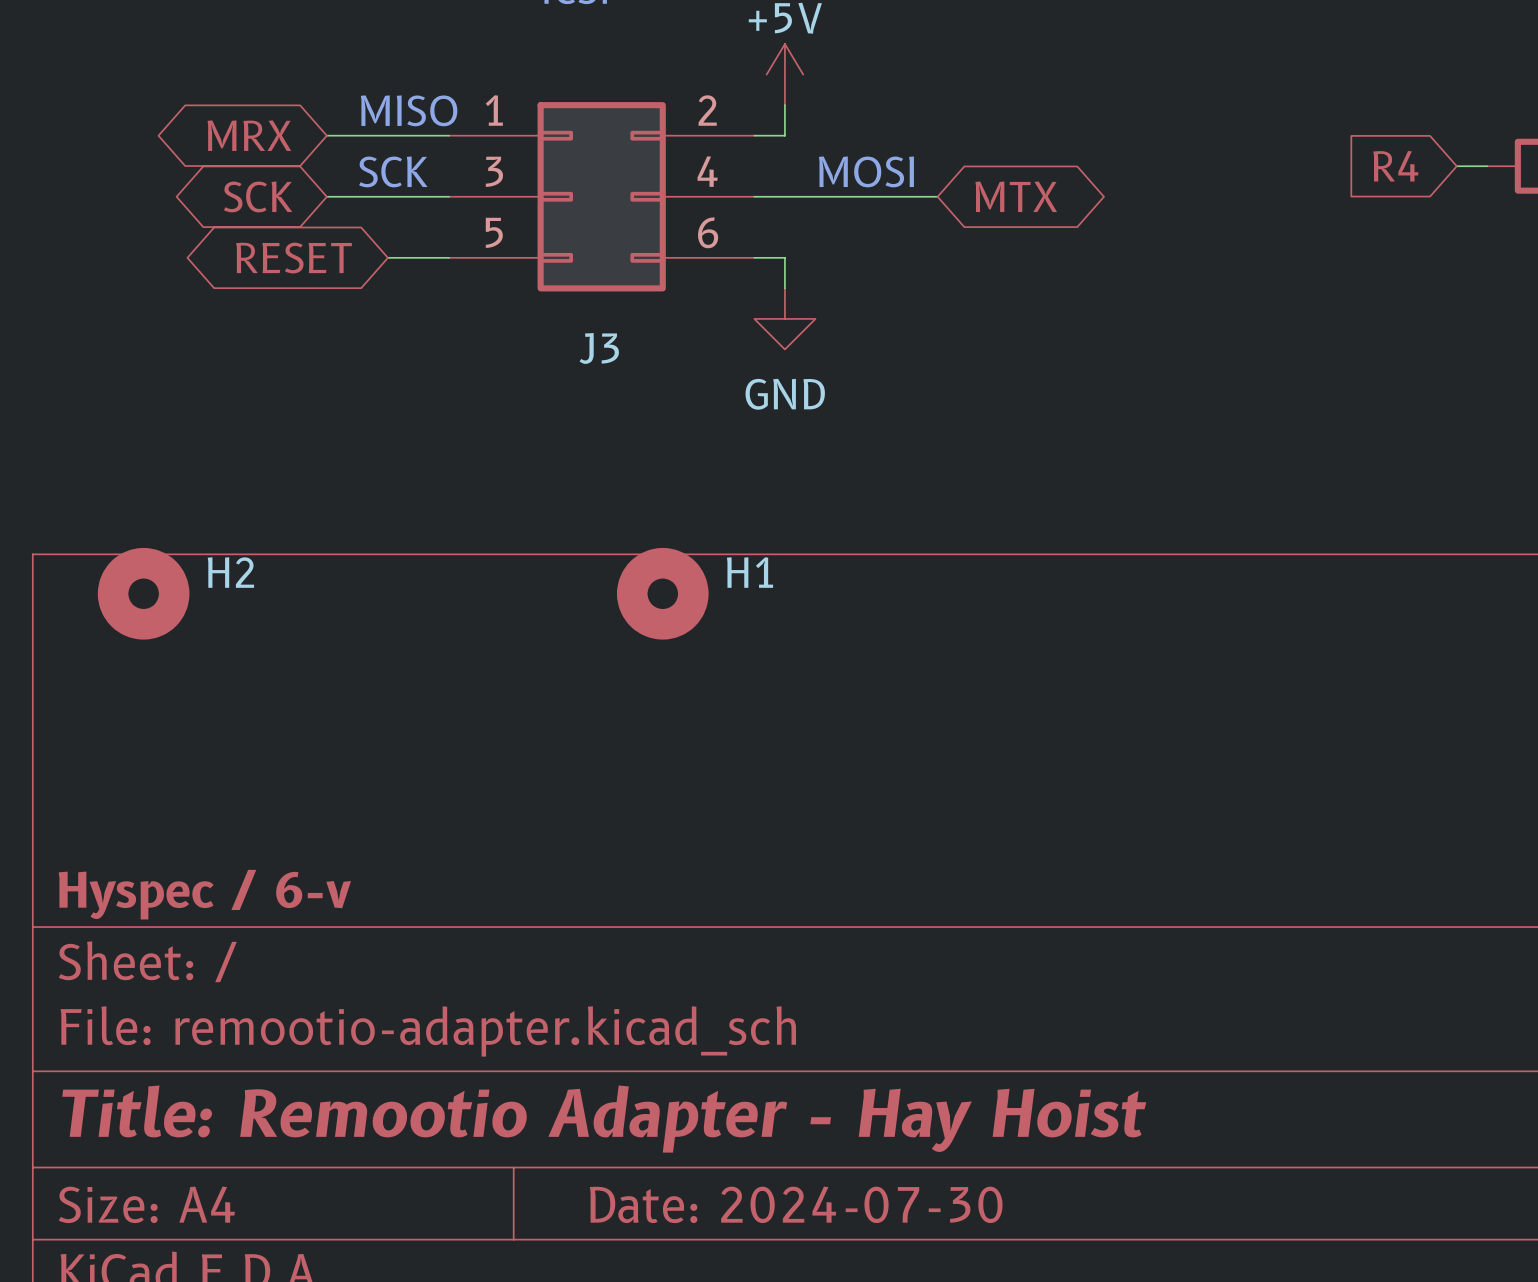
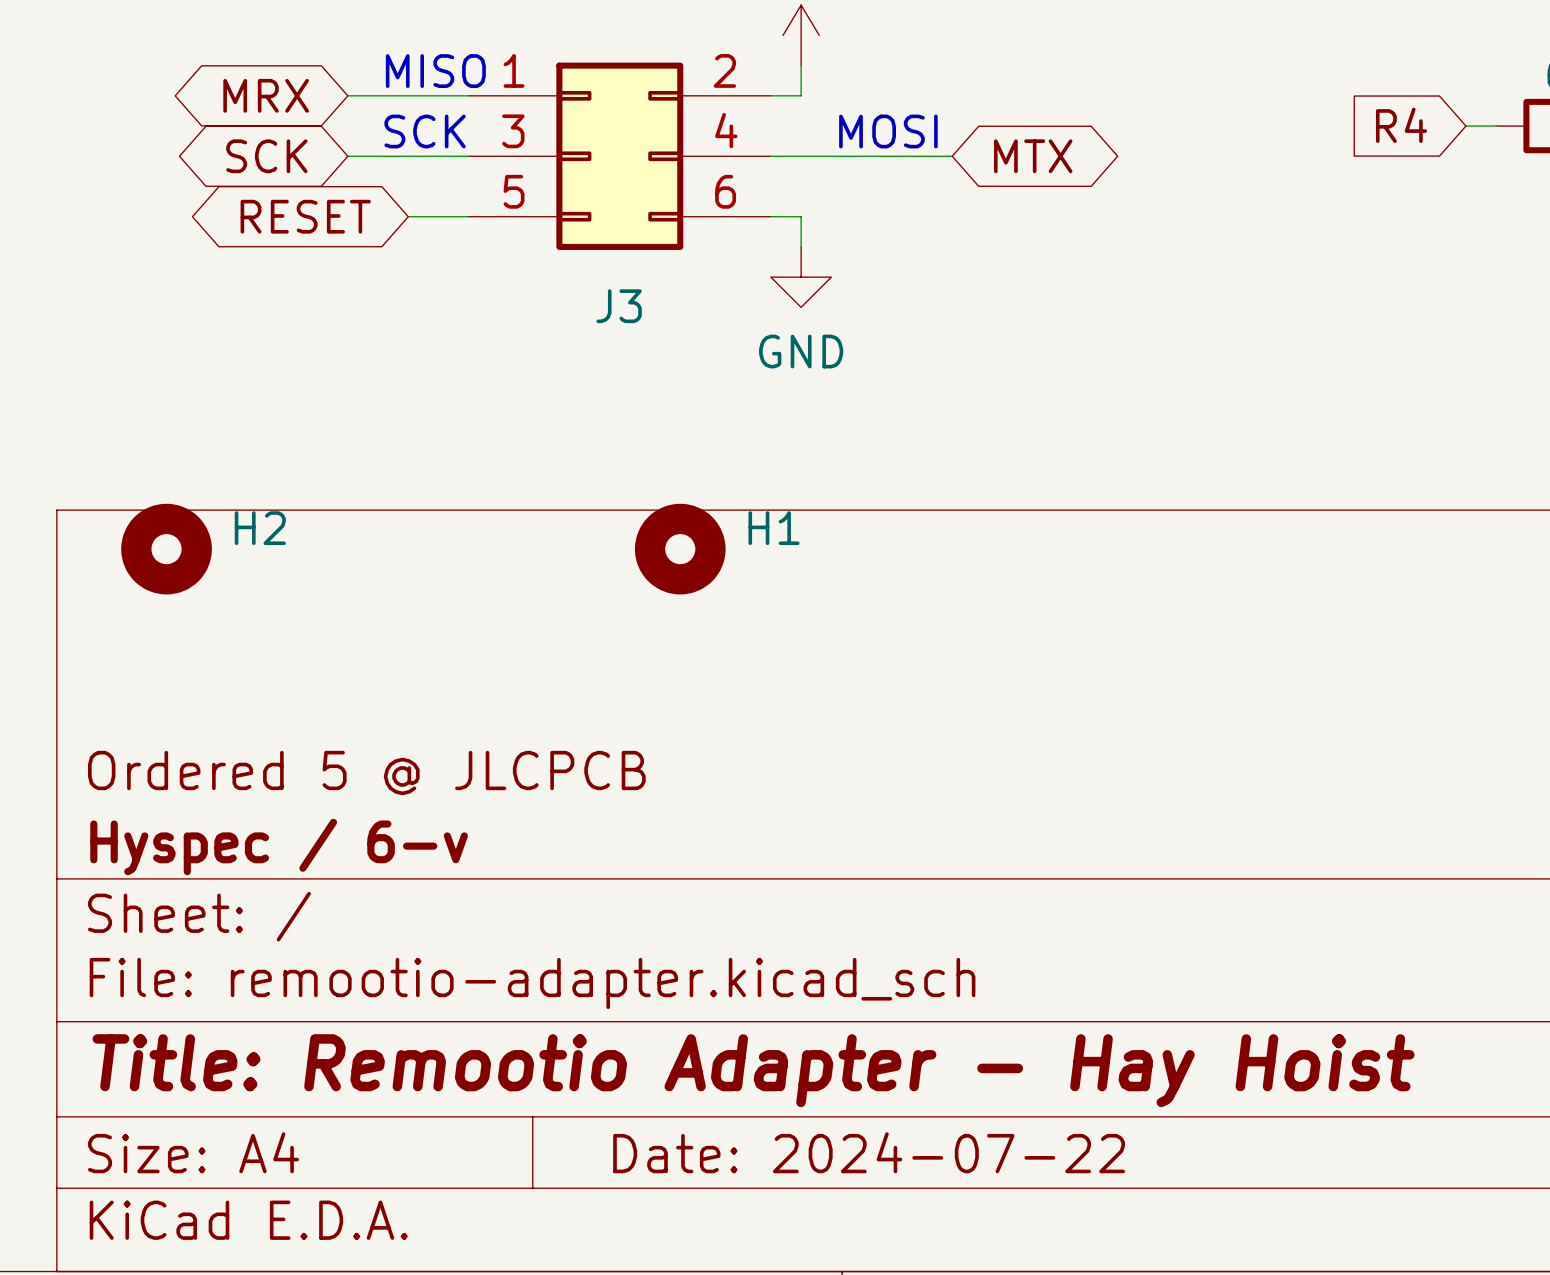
title block: none -> Ordered 5 @ JLCPCB (366, 773)
title block: Date: 2024-07-30 (796, 1204) -> Date: 2024-07-22 (869, 1152)

